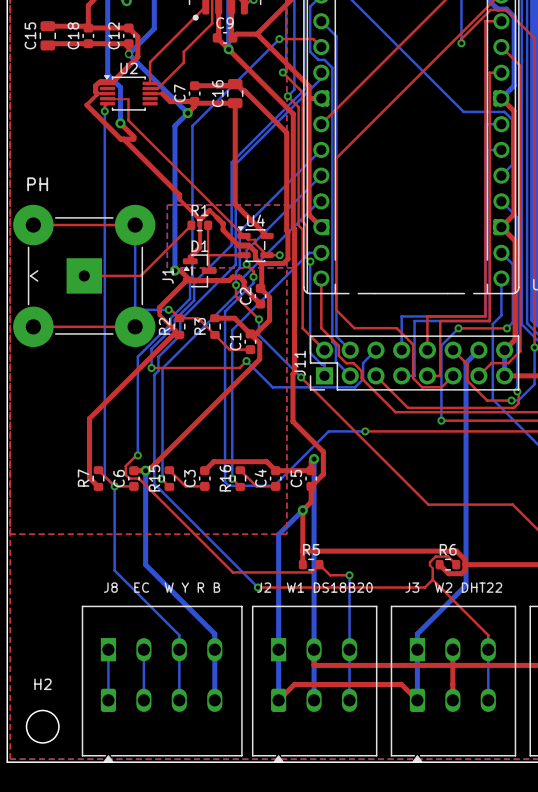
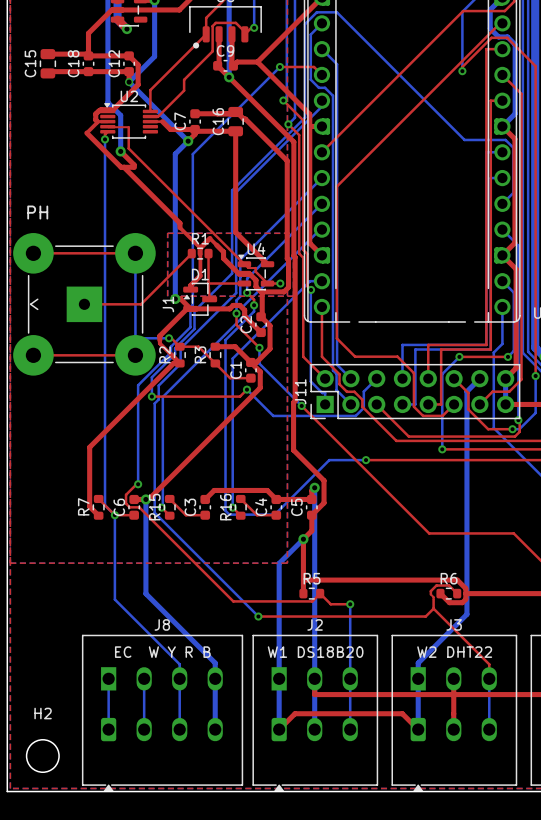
text: J8 EC W Y R B (162, 587) -> none
text: J2 W1 DS18B20 (315, 587) -> none
text: J3 W2 DHT22 (453, 587) -> none
J8 name: none -> J8 (162, 624)
J2 name: none -> J2 (315, 624)
J3 name: none -> J3 (454, 624)
text: none -> EC W Y R B (162, 652)
text: none -> W1 DS18B20 (315, 652)
text: none -> W2 DHT22 (454, 652)

